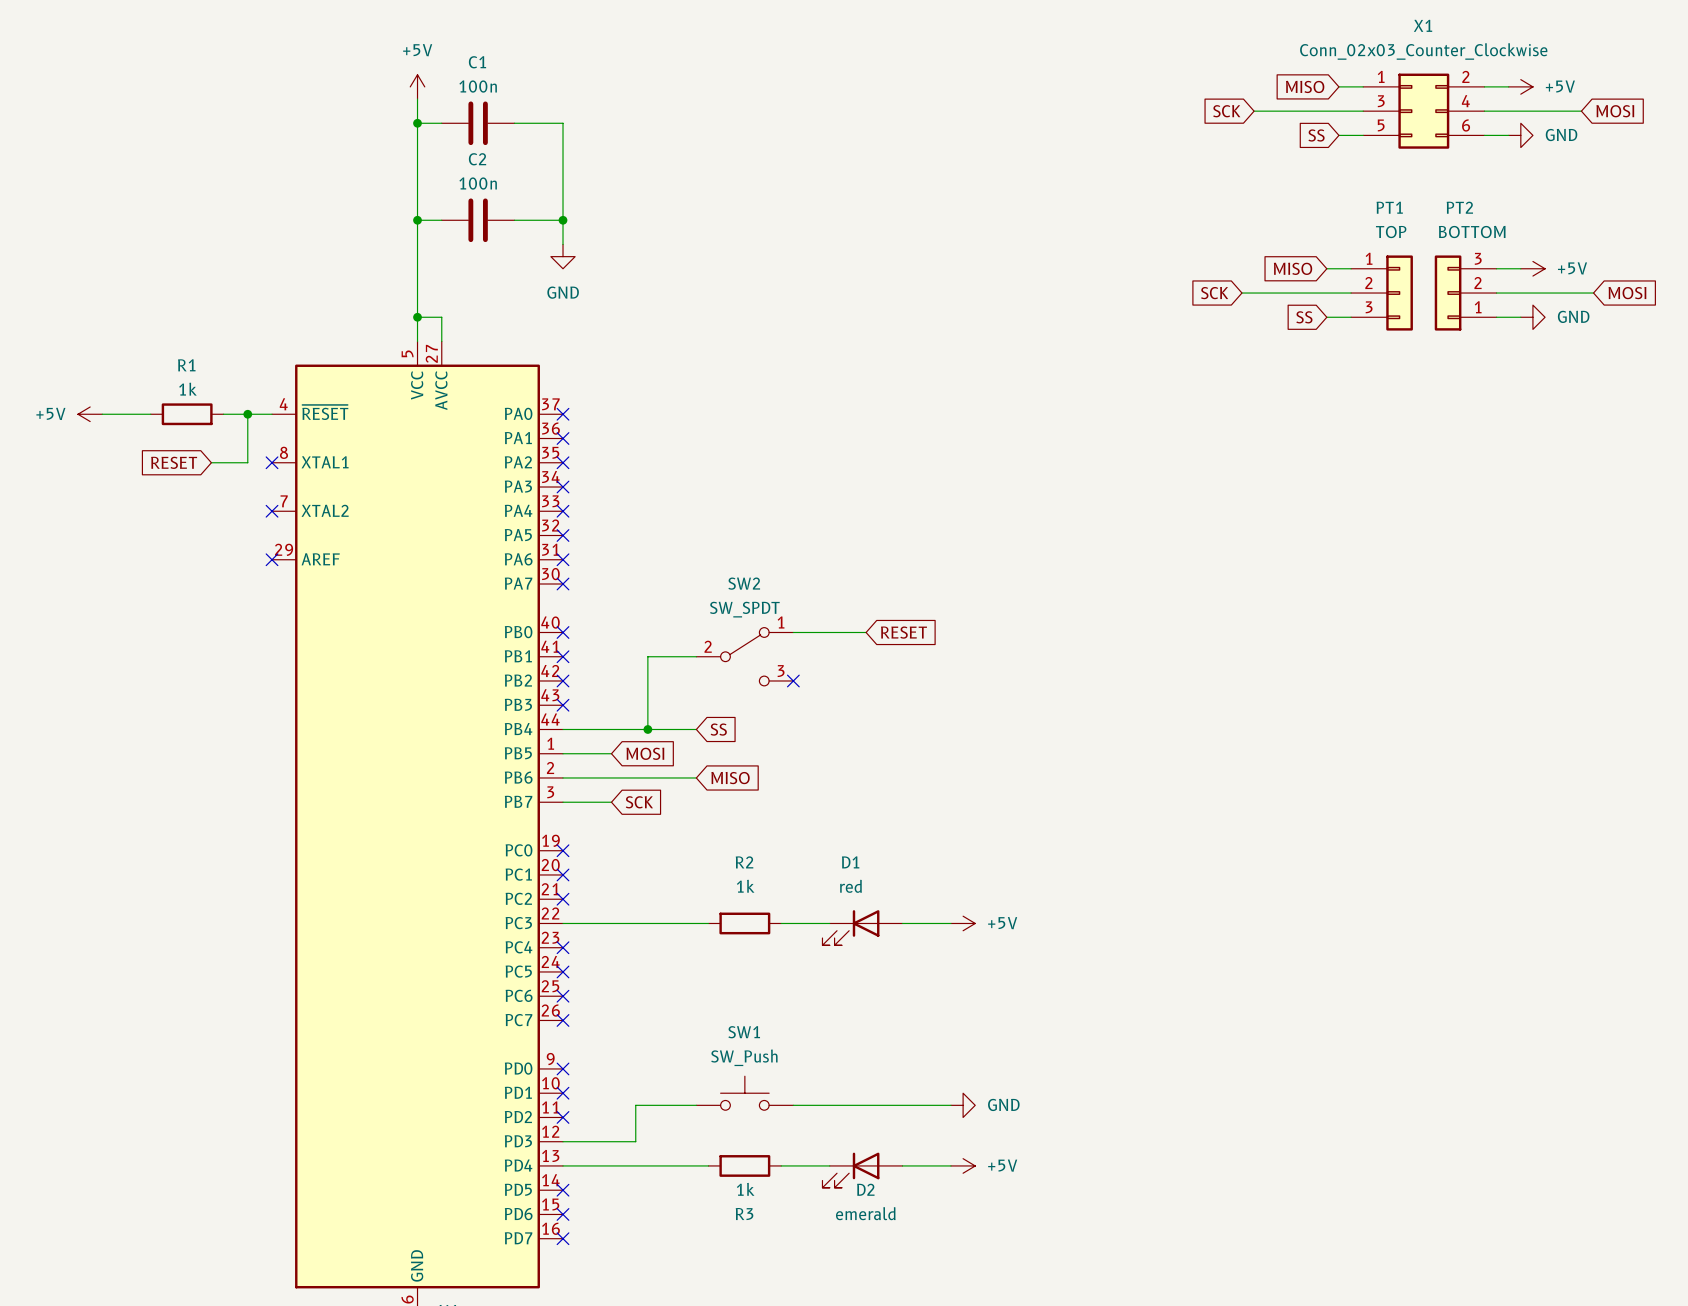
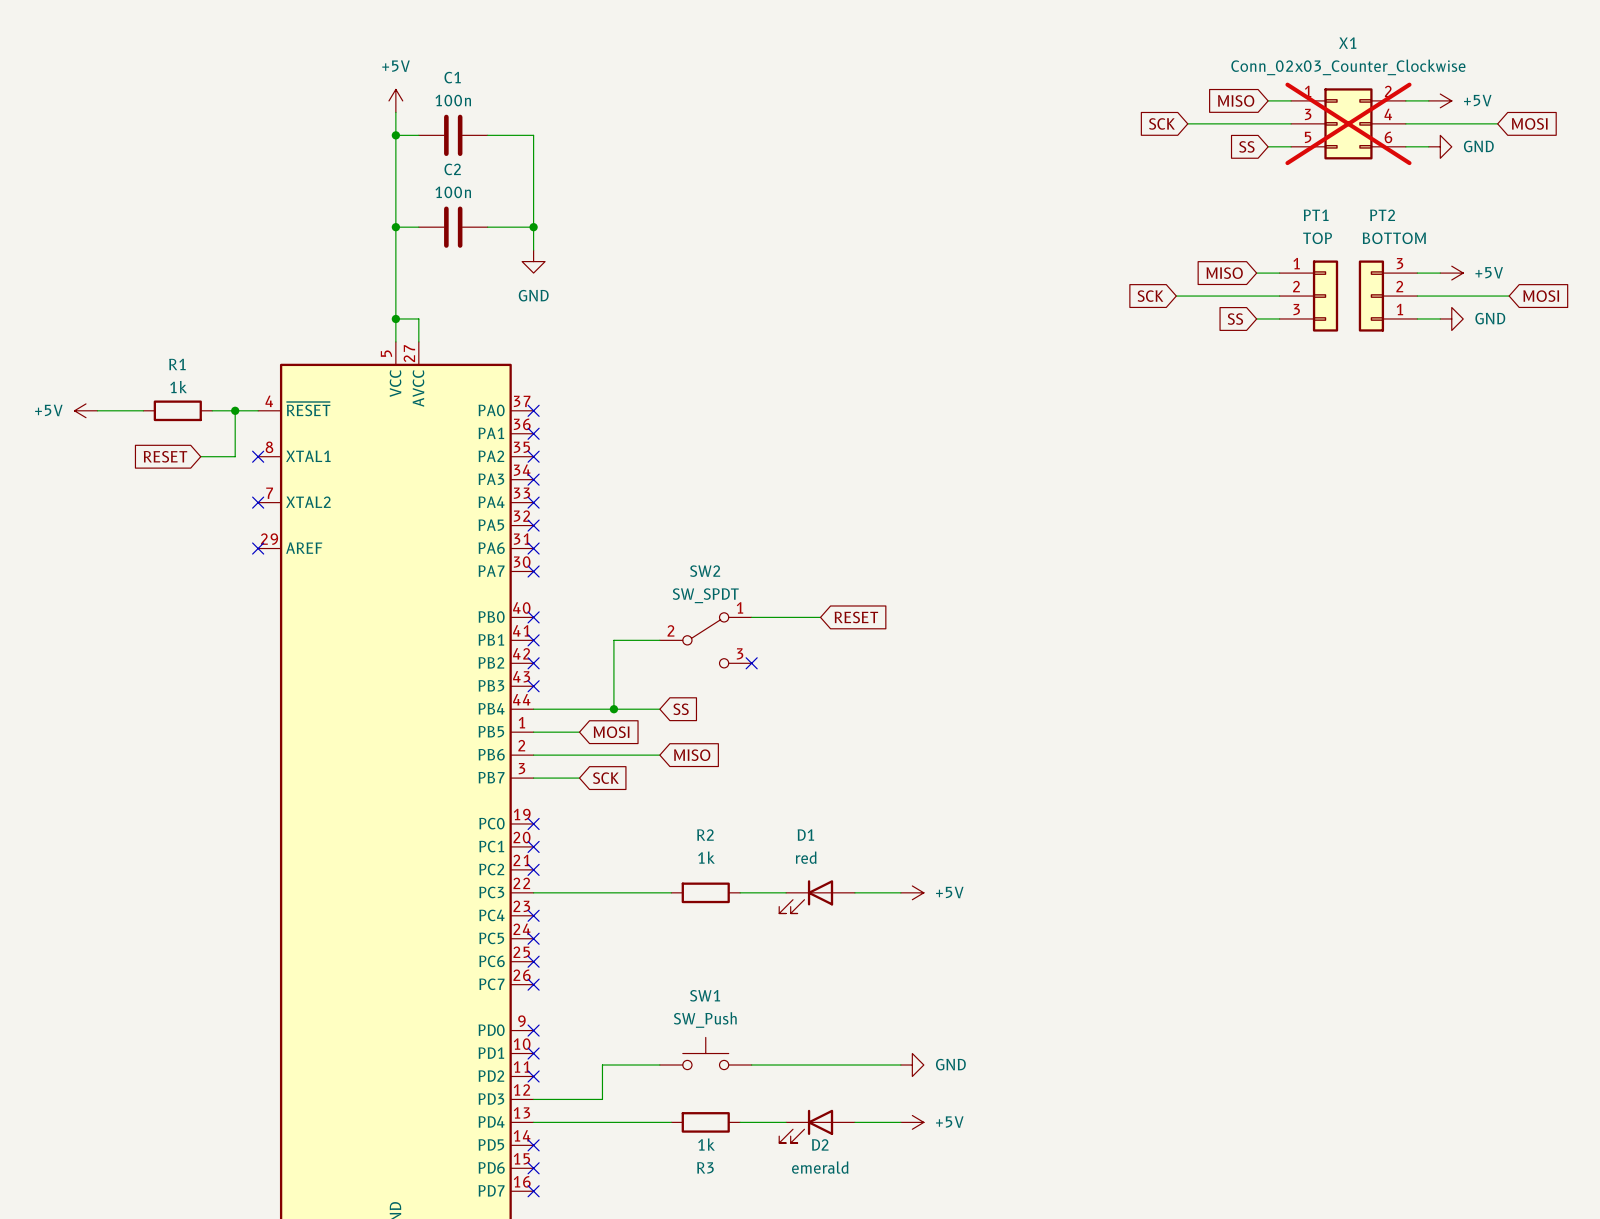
X1 do-not-place cross: none -> (1348, 123)

